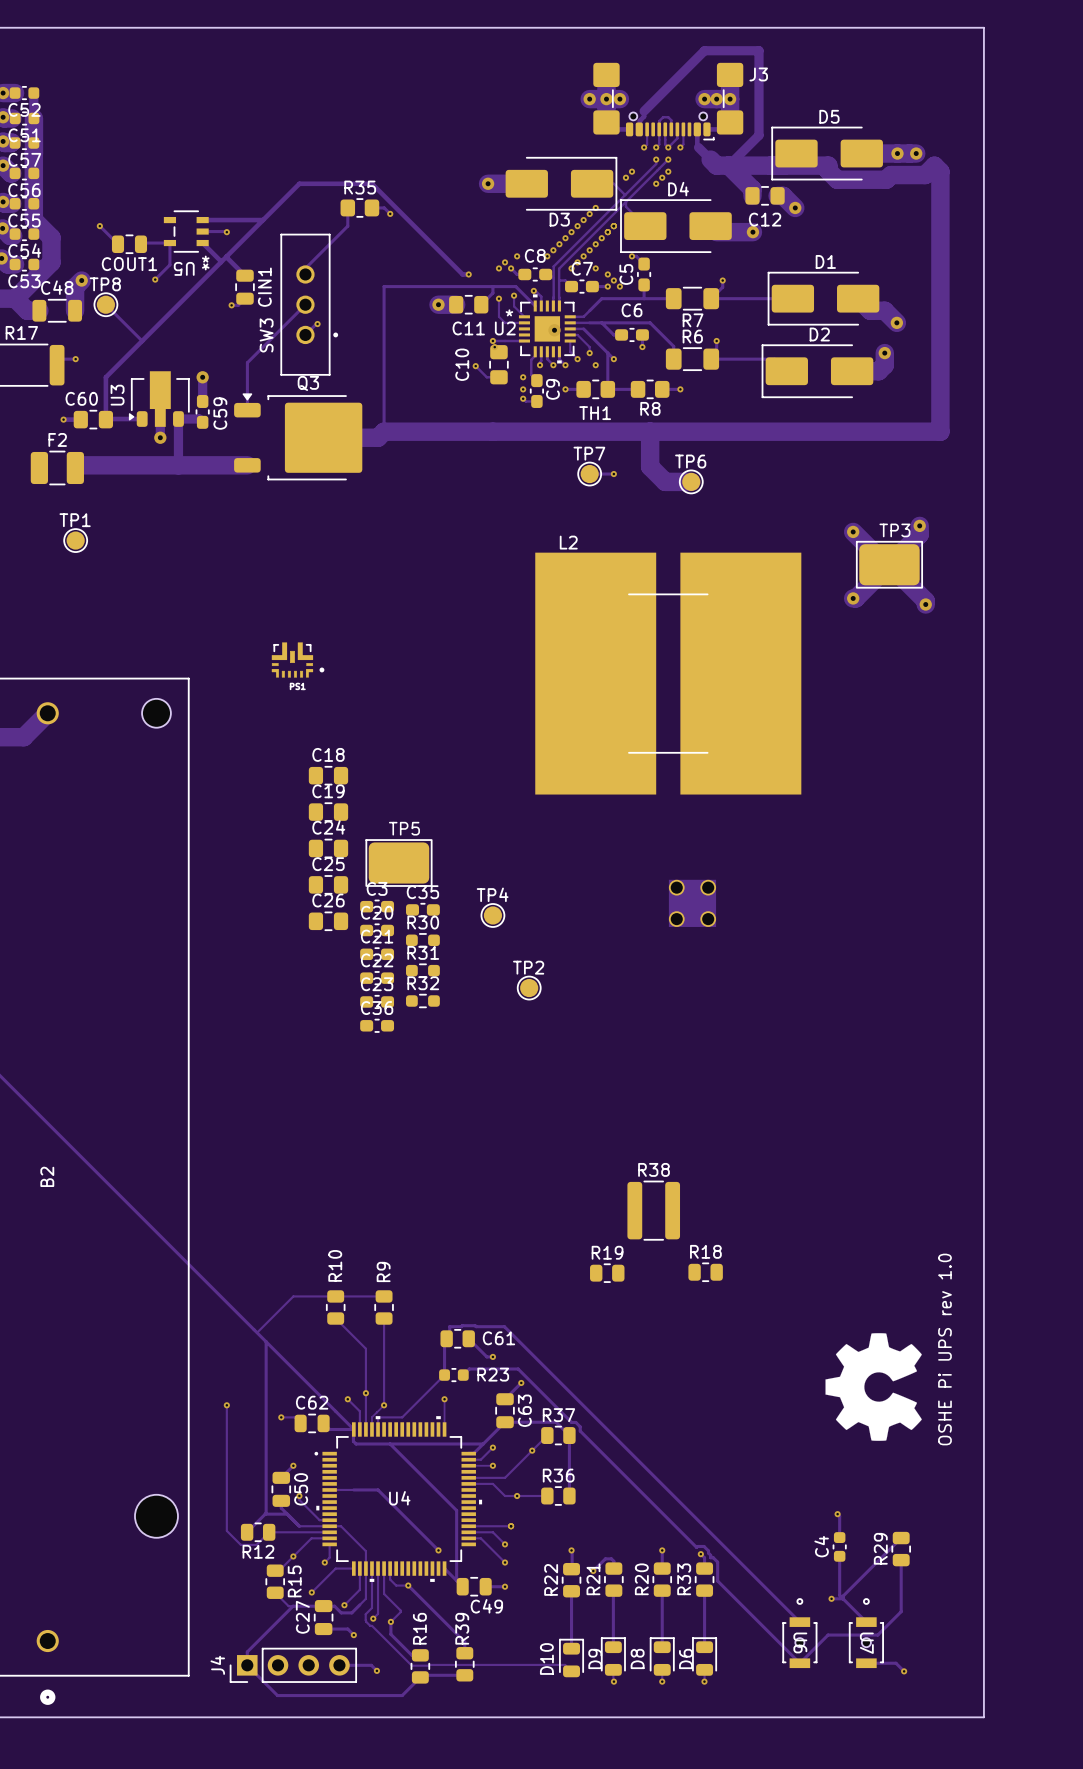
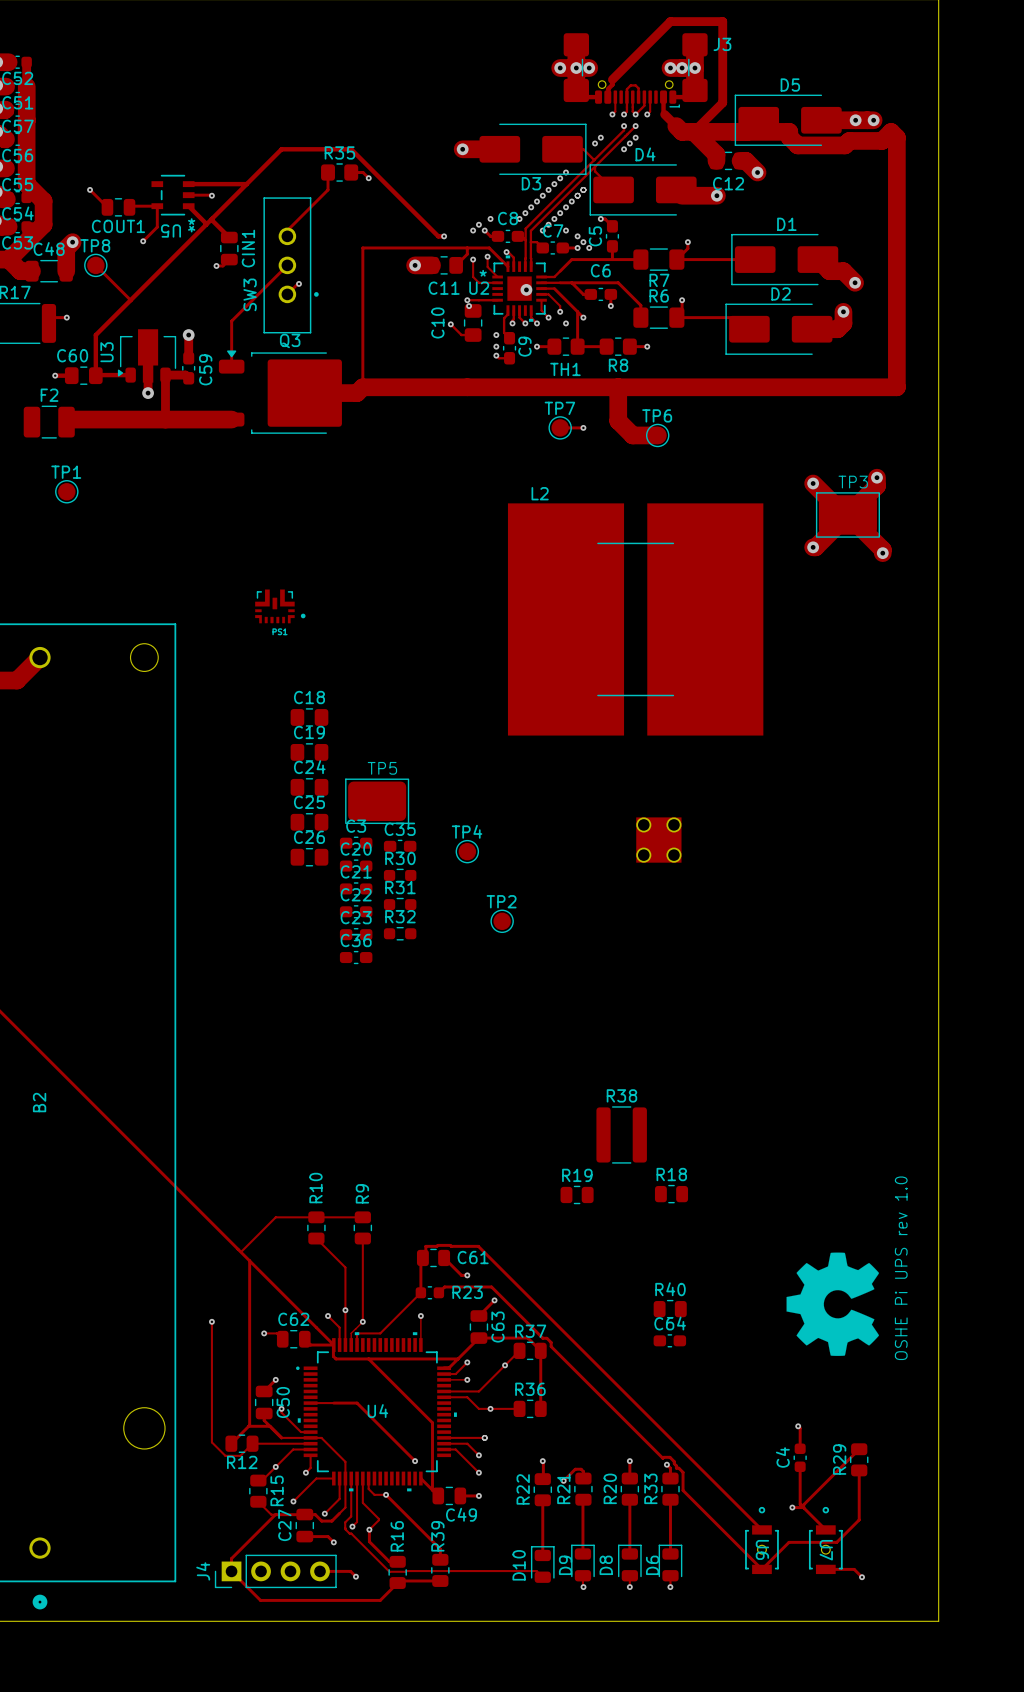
R40: none -> (670, 1309)
C64: none -> (669, 1340)

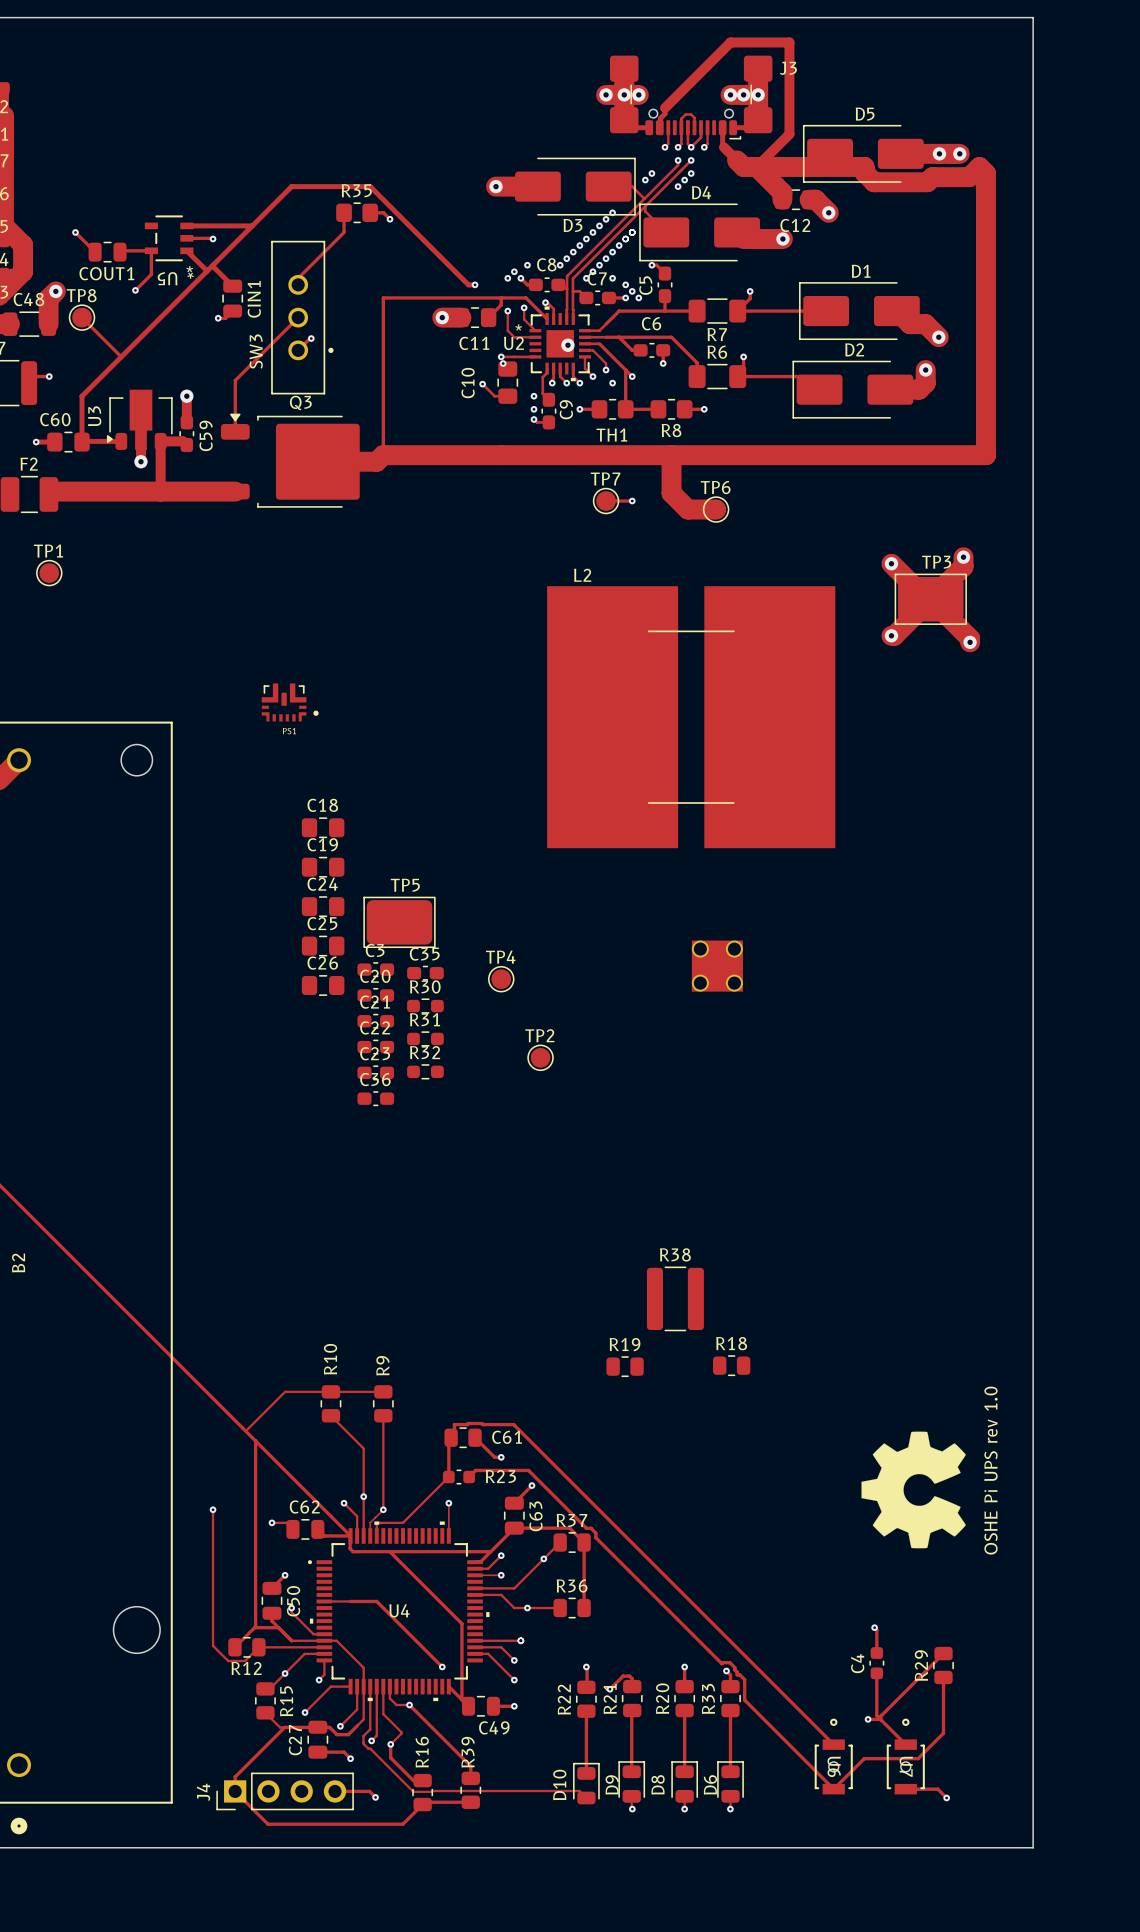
R40: (670, 1309) -> none
C64: (669, 1340) -> none

